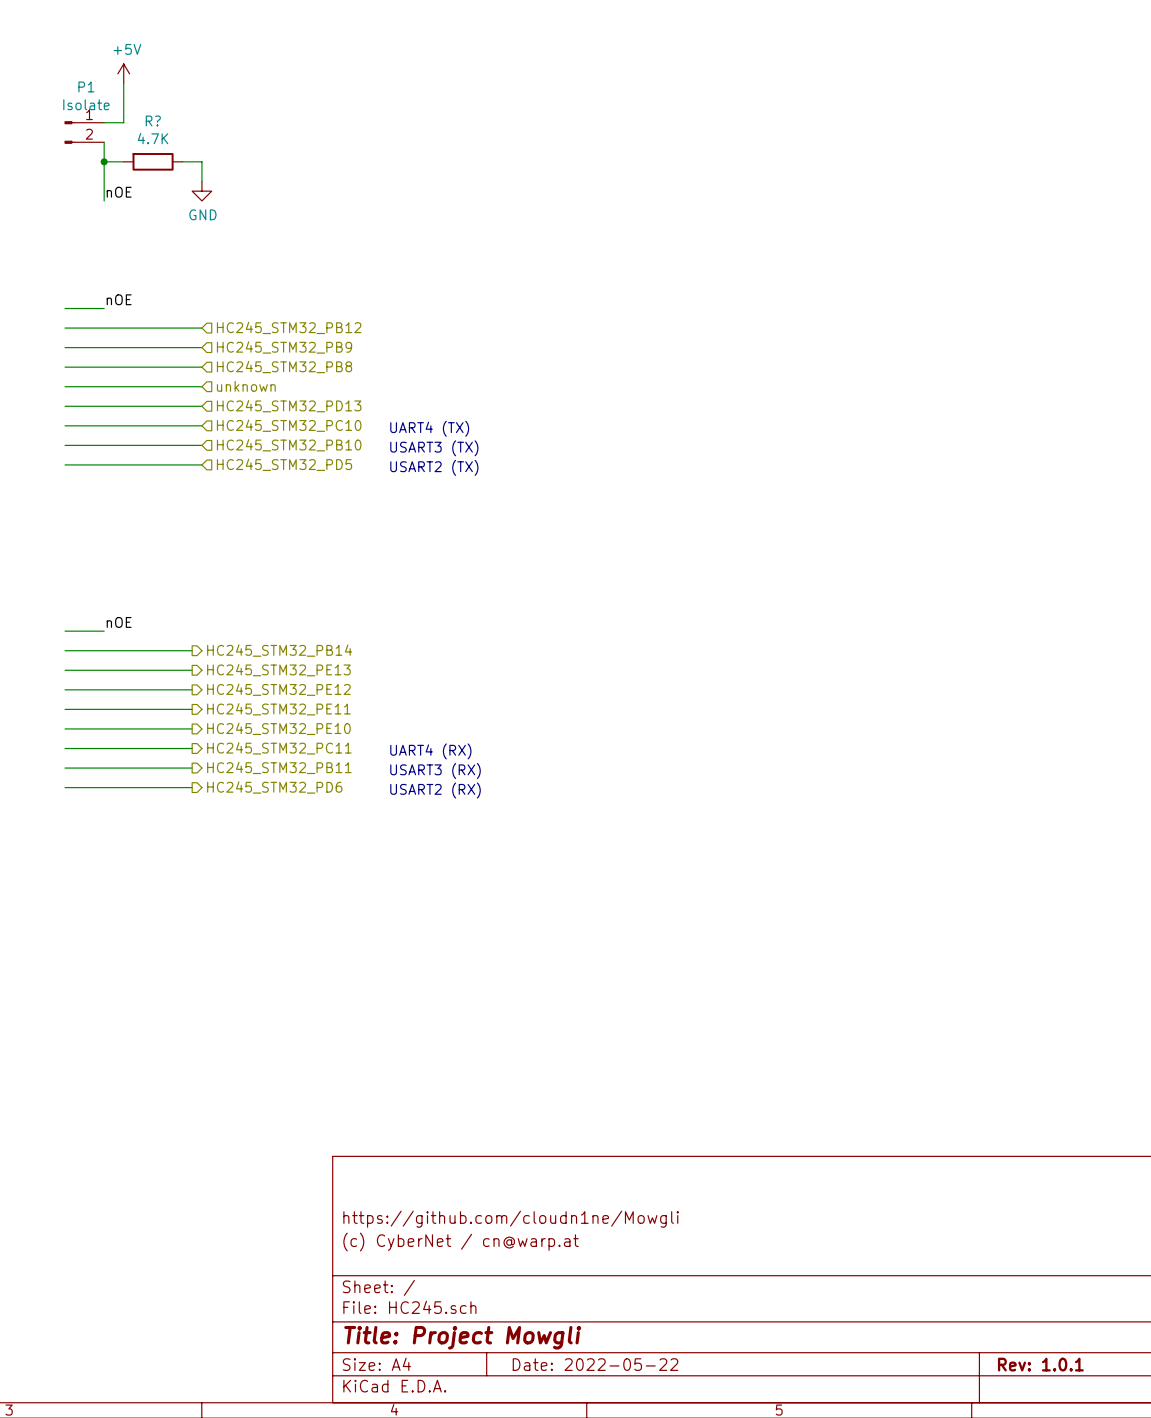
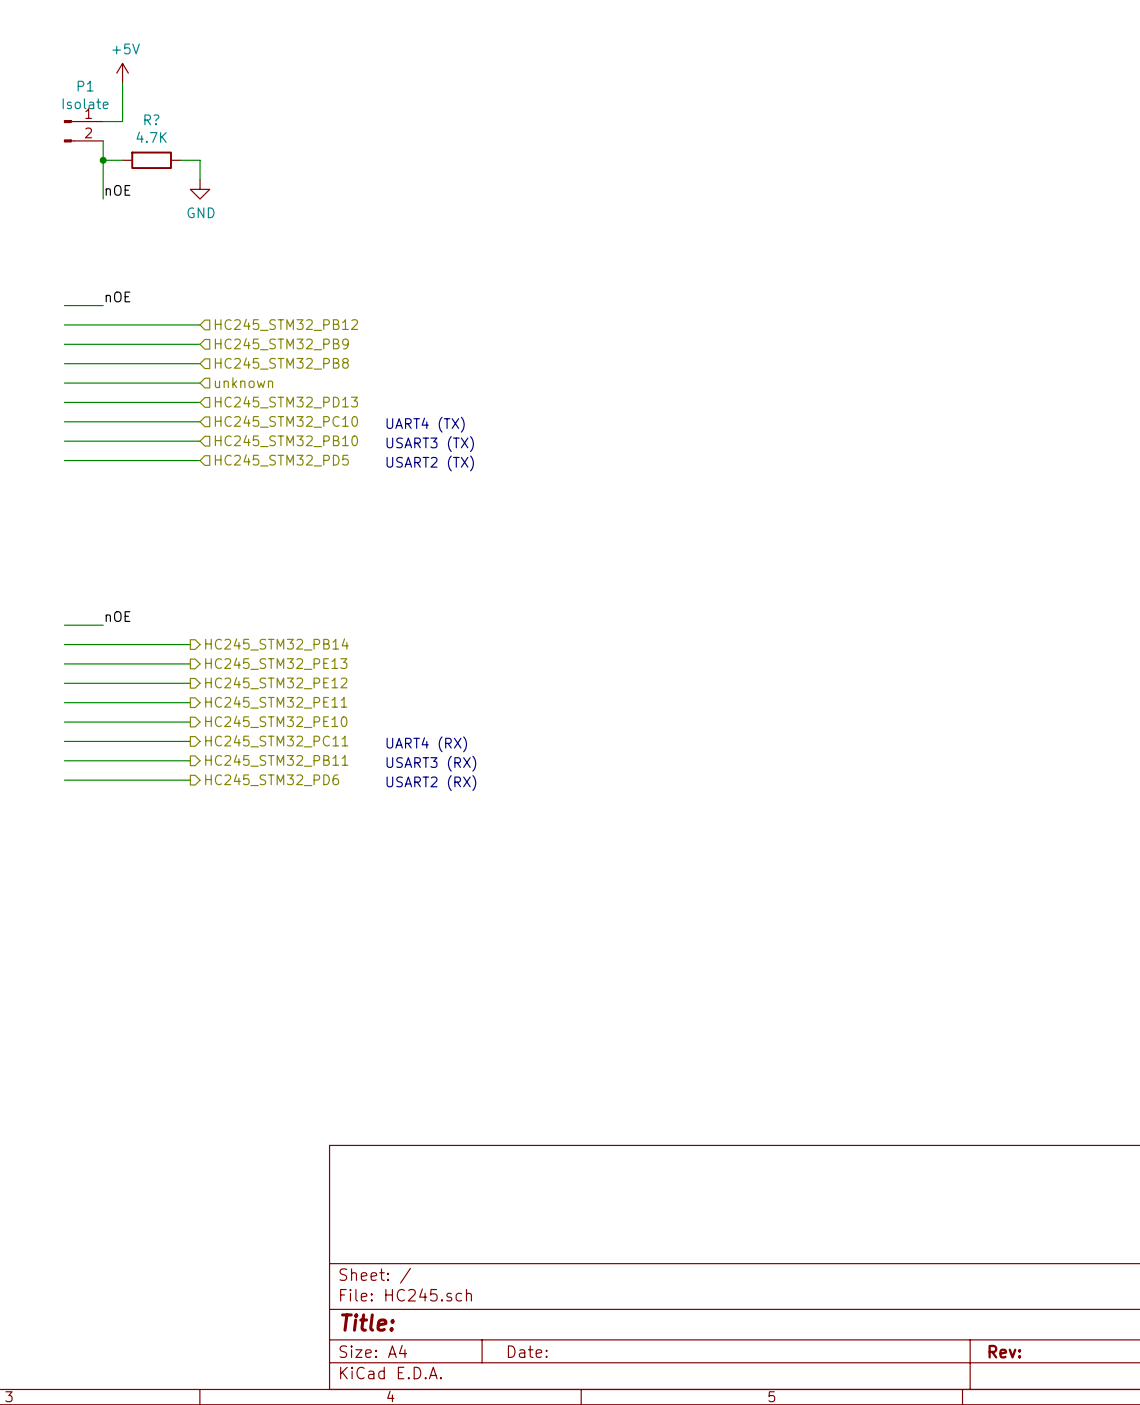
title block: https://github.com/cloudn1ne/Mowgli (511, 1219) -> none
title block: (c) CyberNet / cn@warp.at (461, 1242) -> none
title block: Title: Project Mowgli (462, 1337) -> Title: (367, 1322)
title block: Date: 2022-05-22 (595, 1364) -> Date: (527, 1351)
title block: Rev: 1.0.1 (1040, 1364) -> Rev: (1004, 1351)

